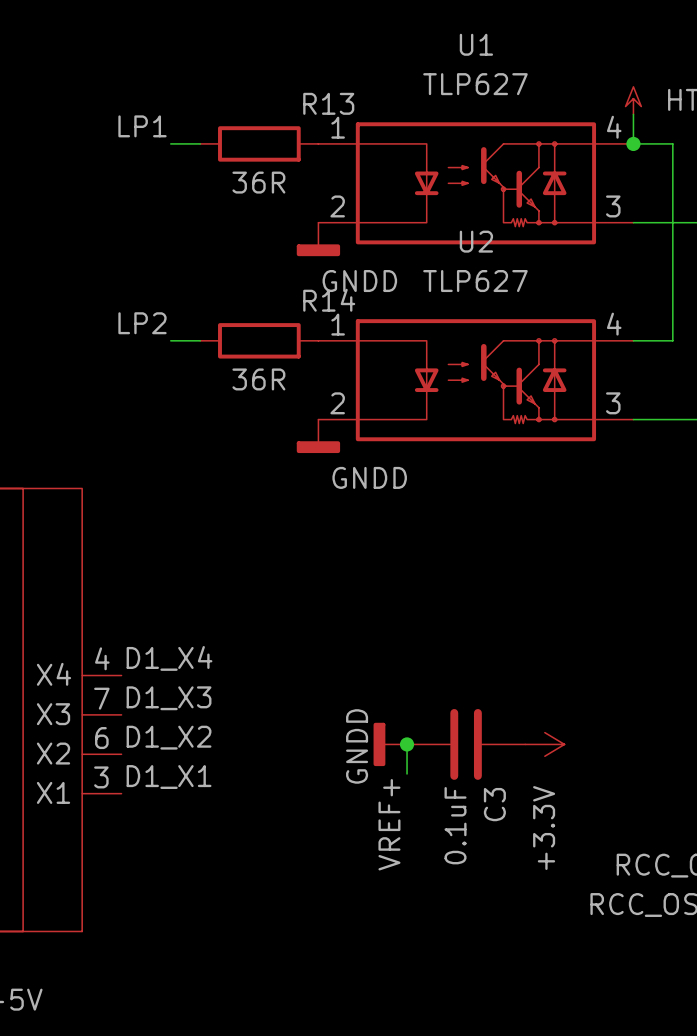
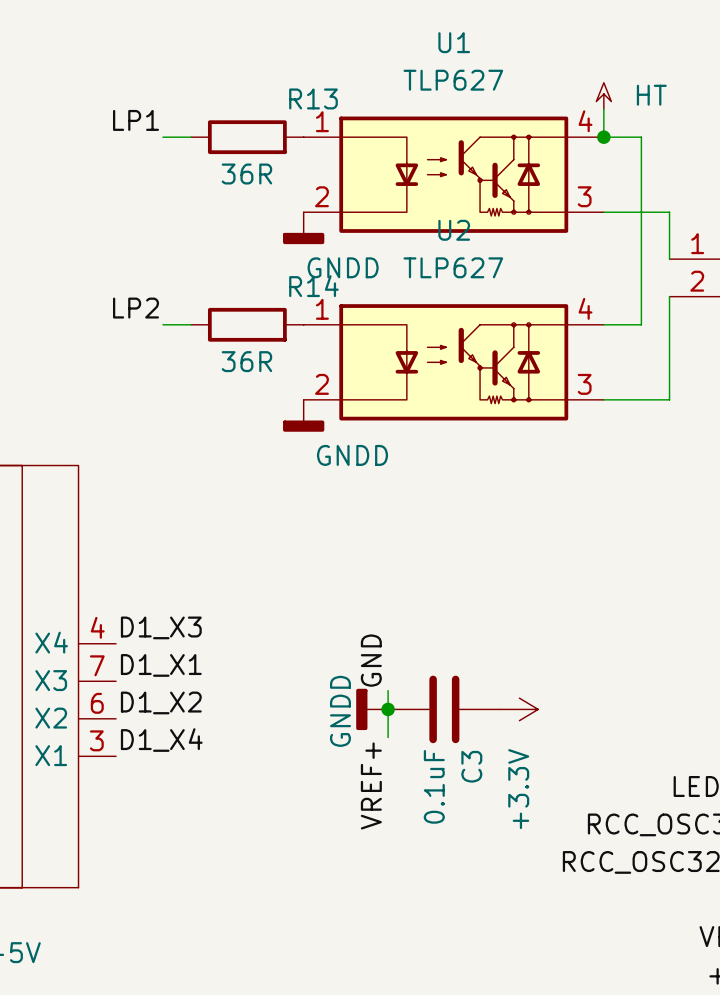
label: D1_X4 (169, 658) -> D1_X3 (161, 627)
label: none -> GND (371, 660)
label: D1_X3 (169, 698) -> D1_X1 (161, 665)
wire: none -> (388, 690) (388, 709)
label: D1_X1 (169, 777) -> D1_X4 (161, 740)

